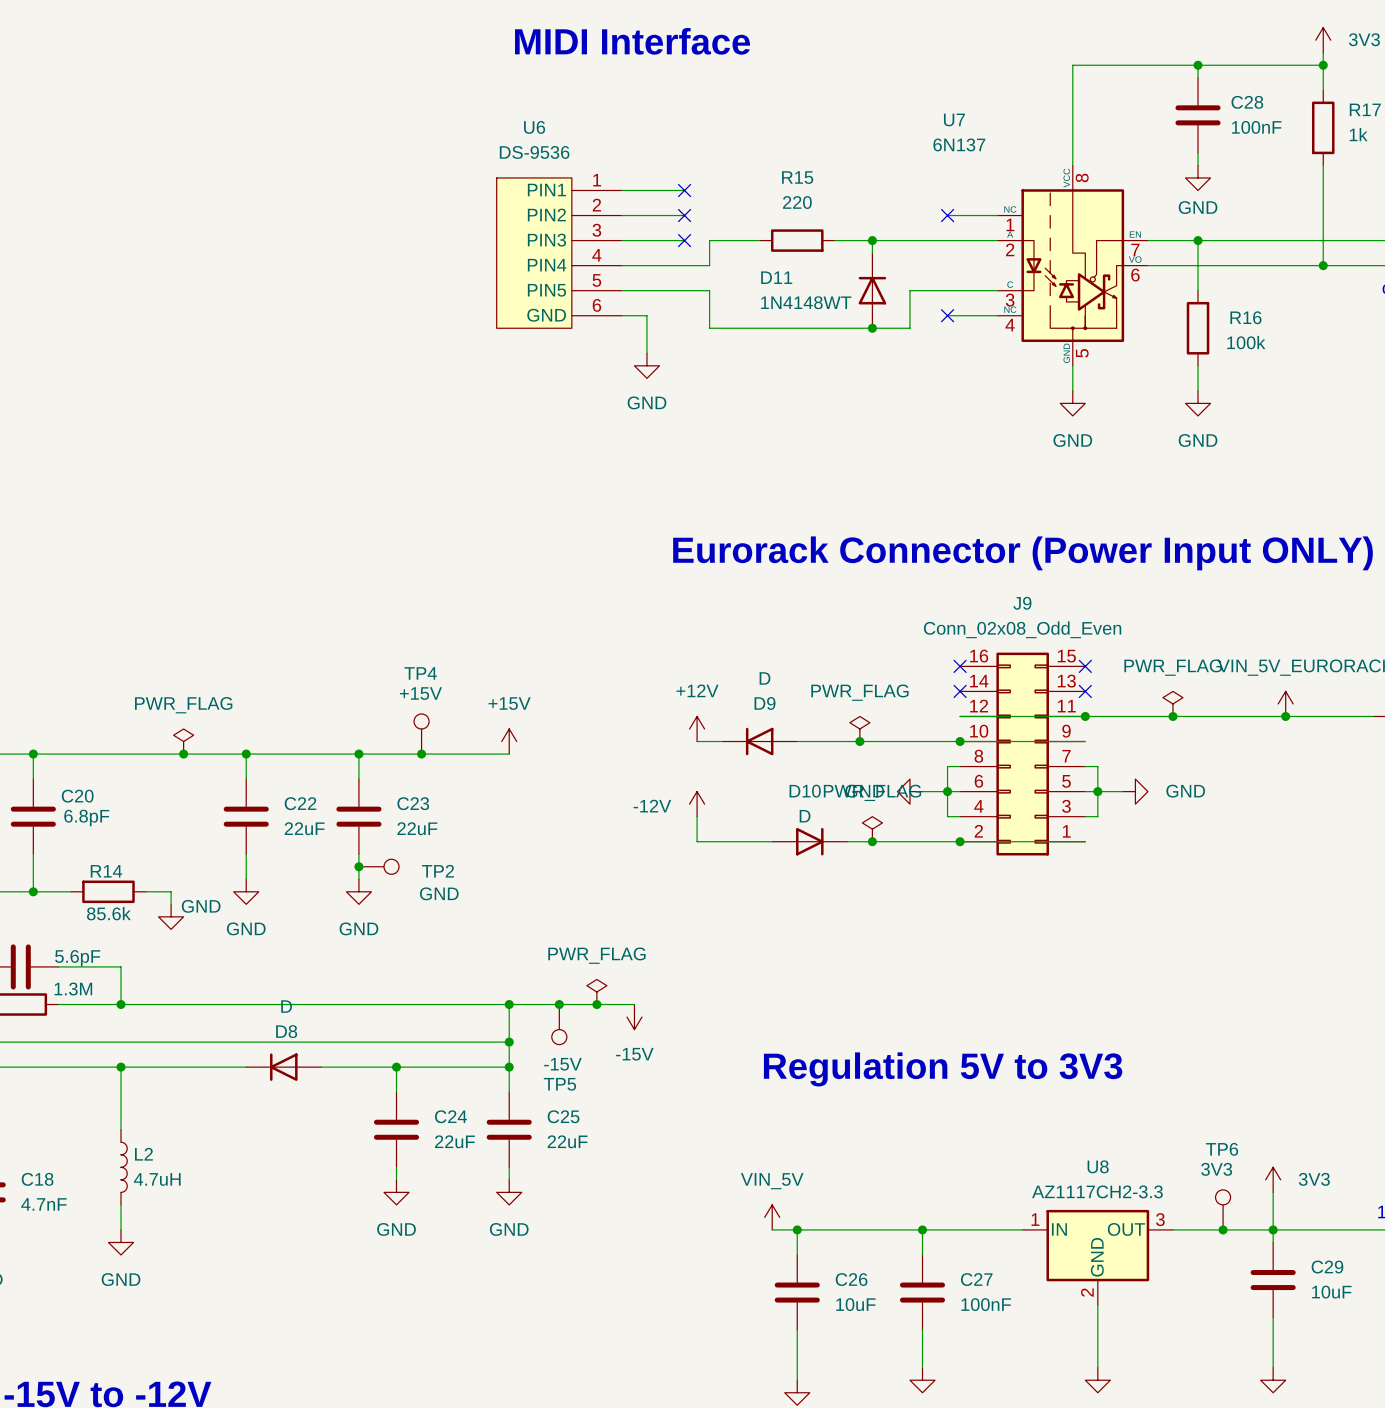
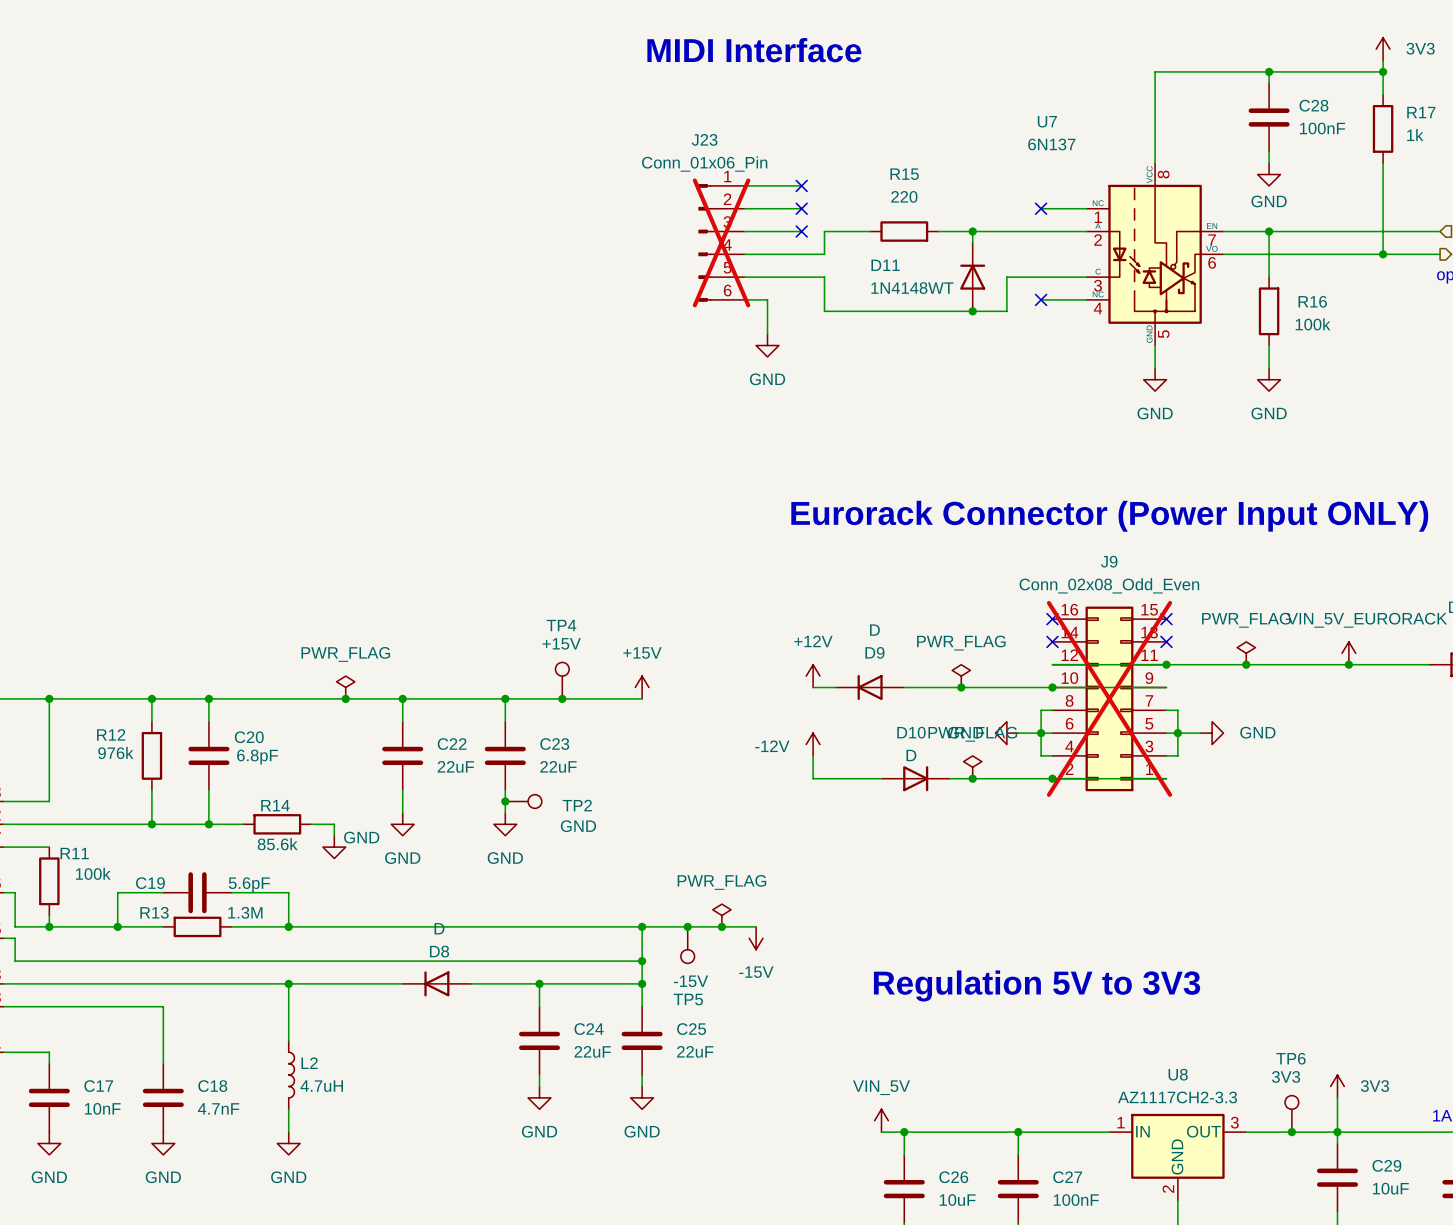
U6: DS-9536 (559, 253) -> none
J23: none -> Conn_01x06_Pin (721, 242)
J9 do-not-place cross: none -> (1109, 698)

